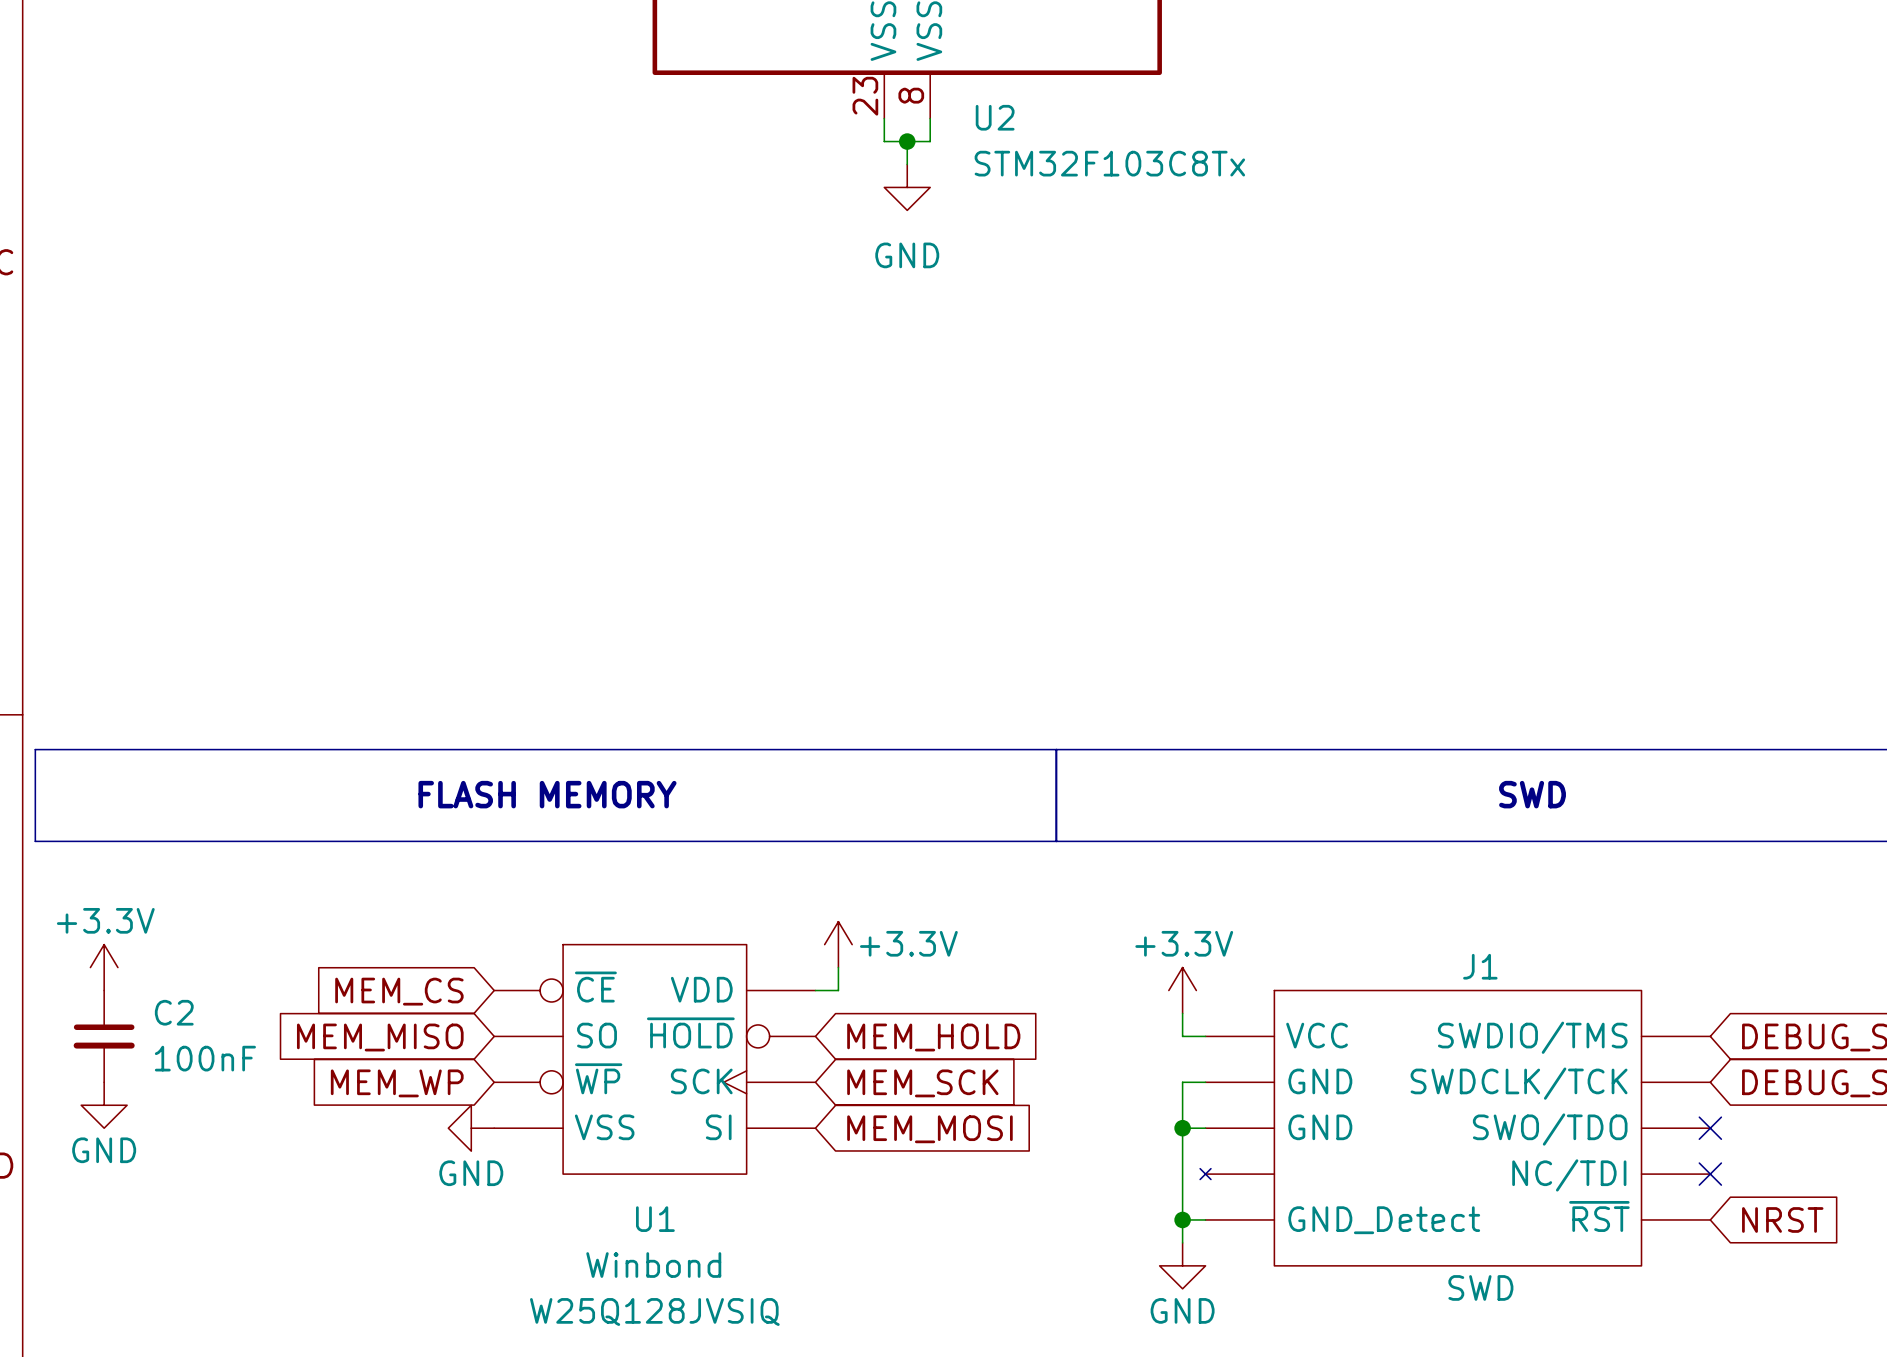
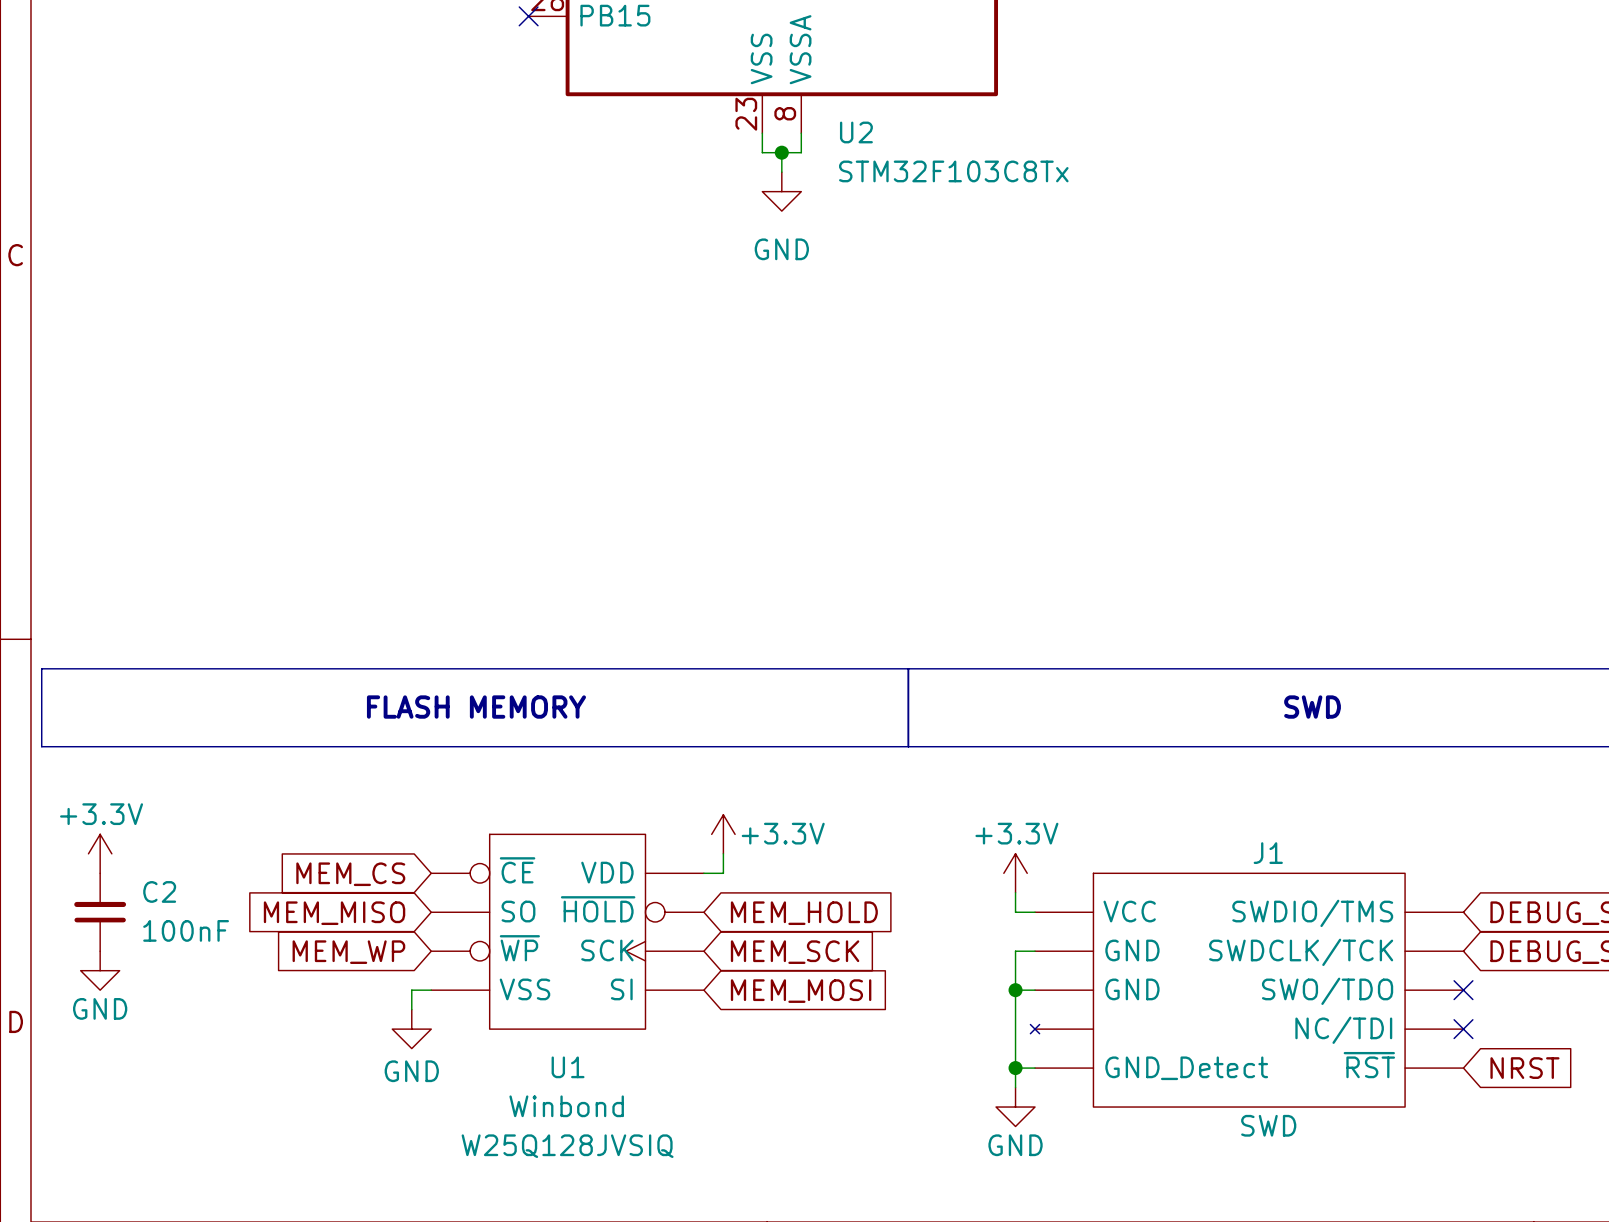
C2 rotation: 0° (104, 1036) -> 180° (100, 912)
power symbol rotation: 0° (471, 1128) -> 90° counterclockwise (411, 1029)
power symbol position: GND (471, 1128) -> GND (411, 1029)

